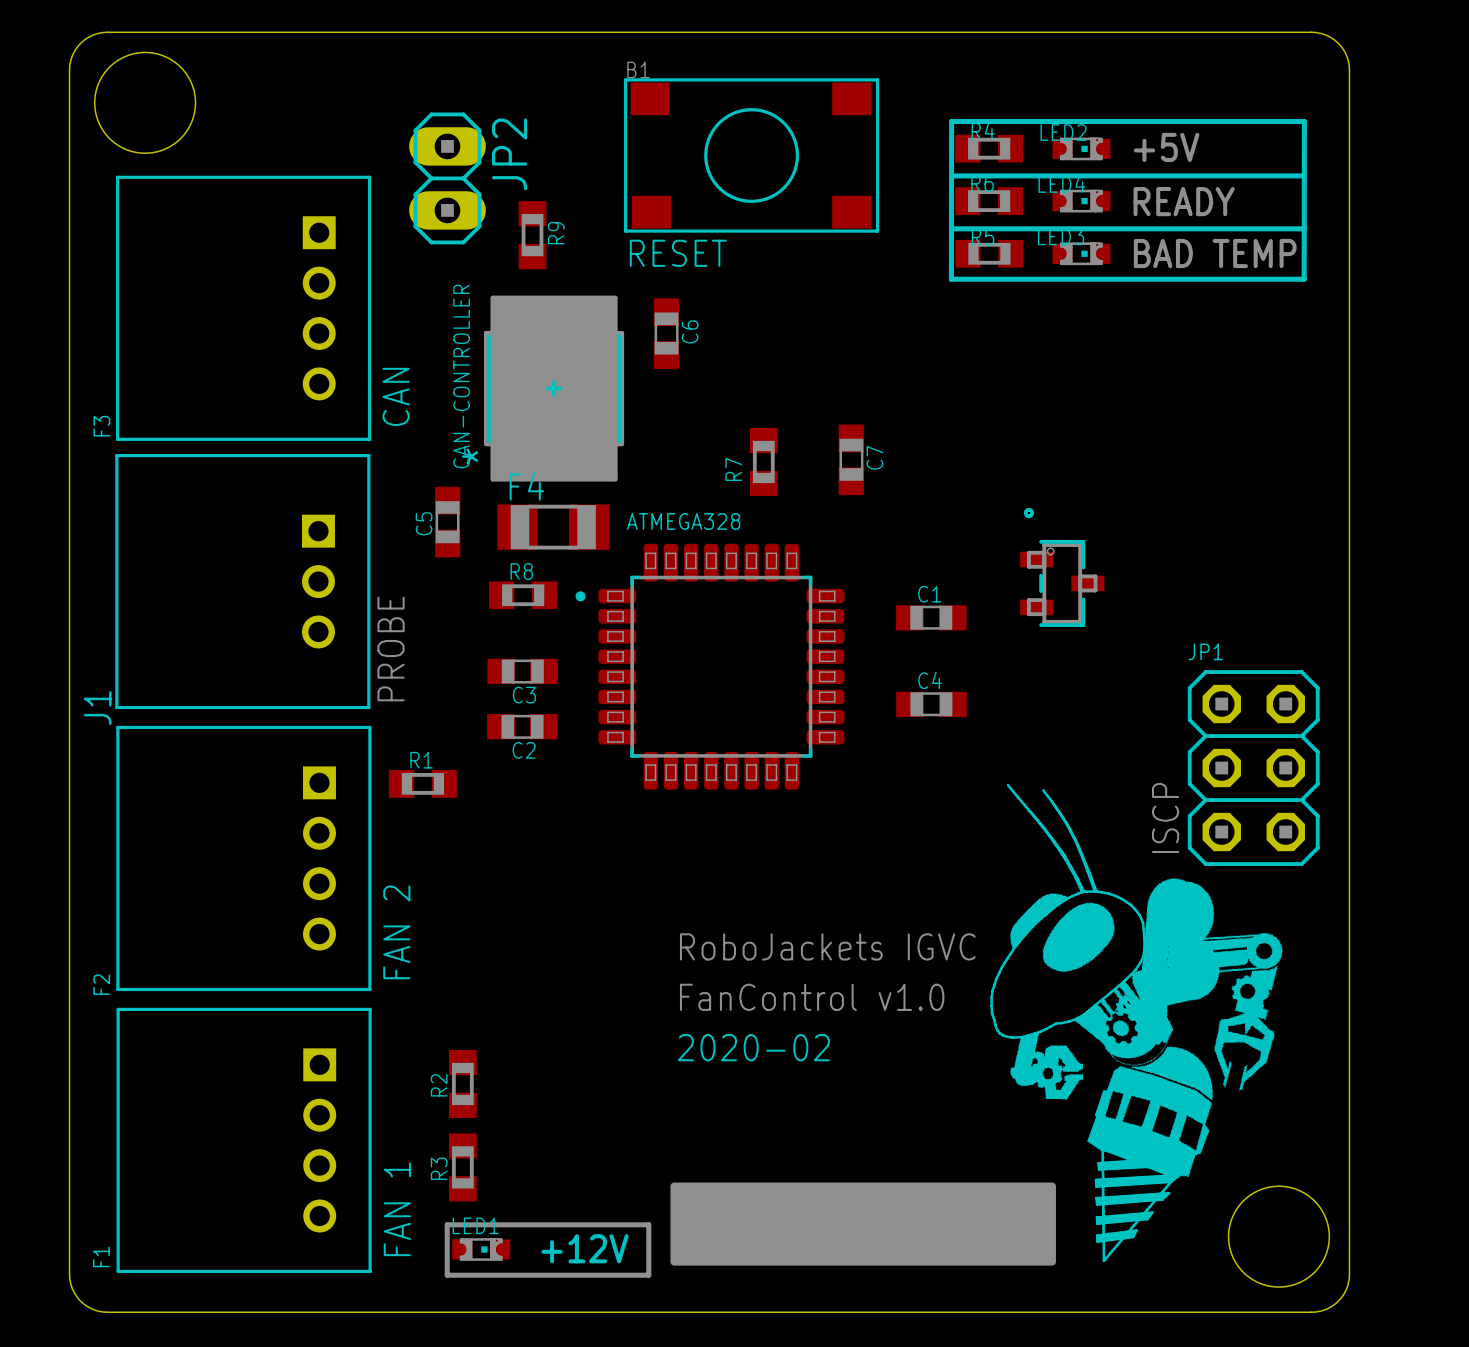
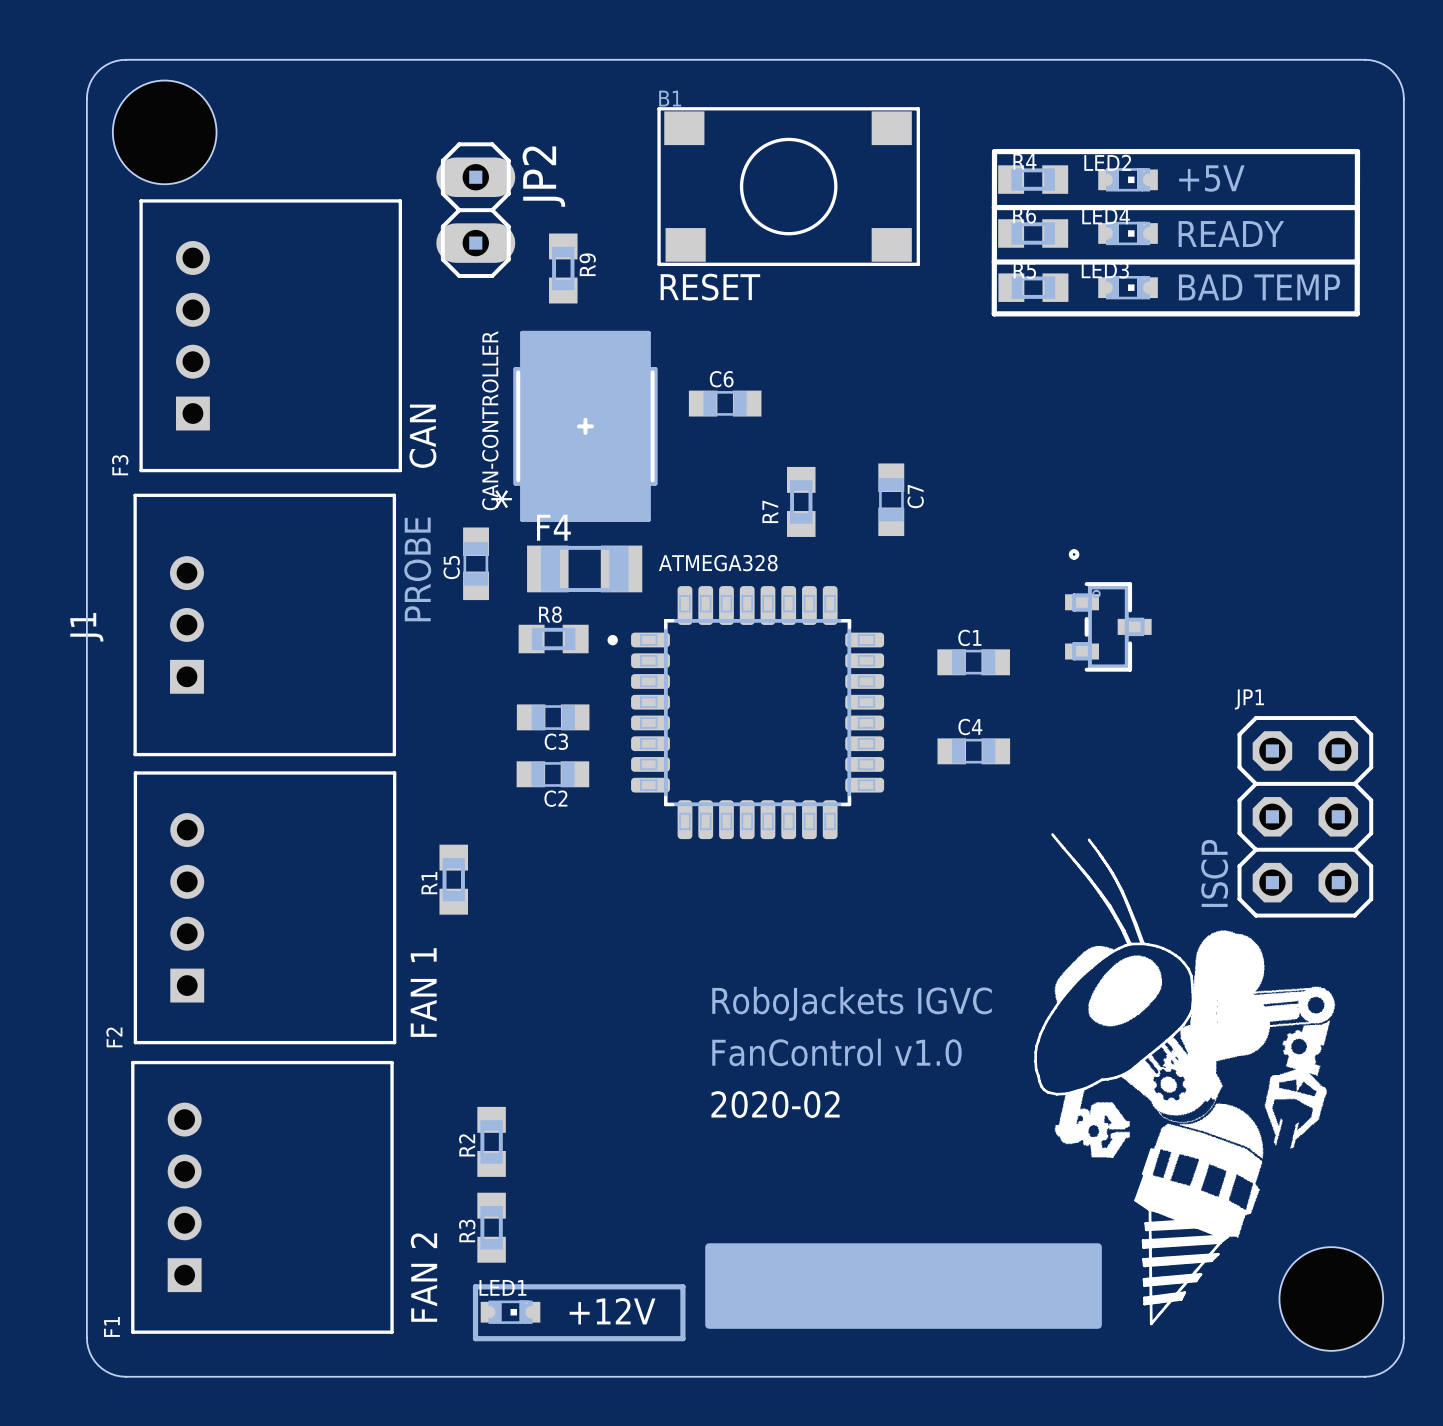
F3 rotation: 0° (243, 308) -> 180° (270, 335)
C6 rotation: 0° (666, 333) -> 90° clockwise (725, 403)
J1 rotation: 0° (242, 581) -> 180° (264, 624)
text position: PROBE (391, 649) -> PROBE (417, 569)
J1 name position: J1 (97, 708) -> J1 (86, 627)
R1 rotation: 0° (422, 783) -> 90° clockwise (453, 879)
R1 position: (422, 783) -> (453, 879)
F2 rotation: 0° (243, 858) -> 180° (265, 907)
text: FAN 2 (396, 932) -> FAN 1 (423, 992)
F1 rotation: 0° (244, 1140) -> 180° (262, 1197)
text: FAN 1 (397, 1209) -> FAN 2 (423, 1277)

